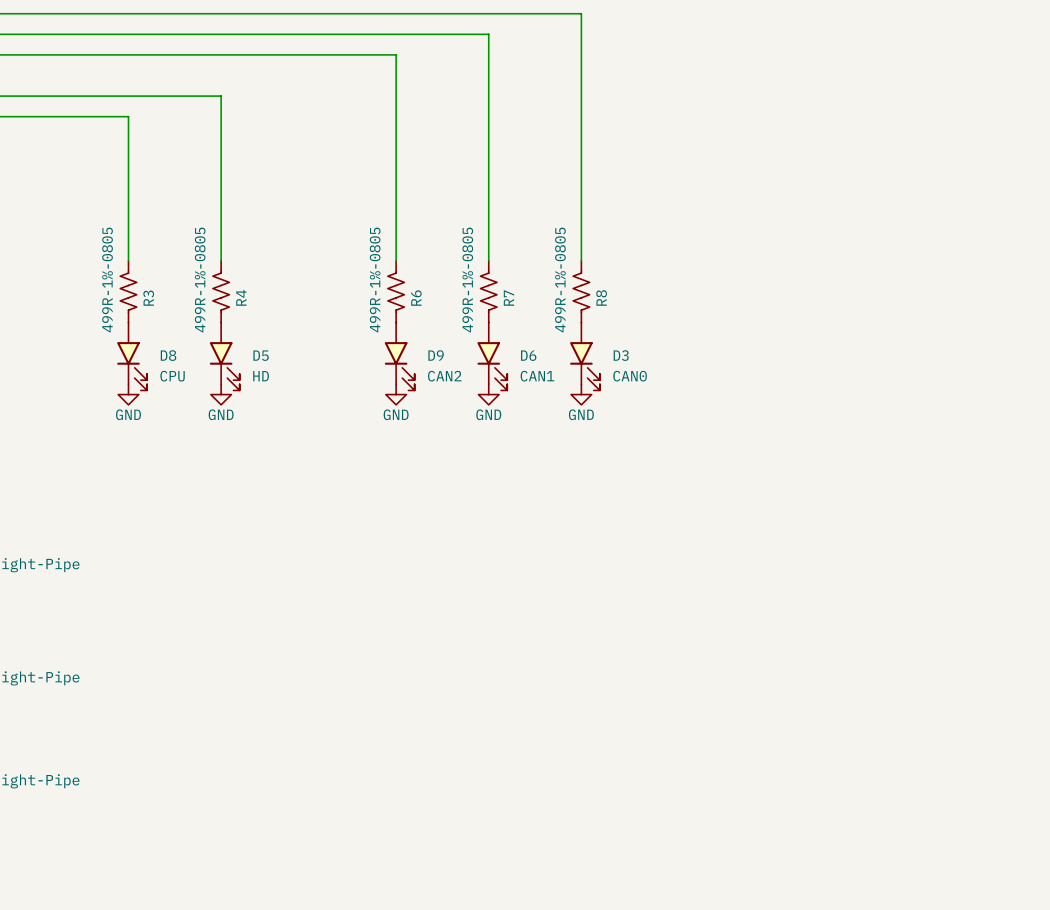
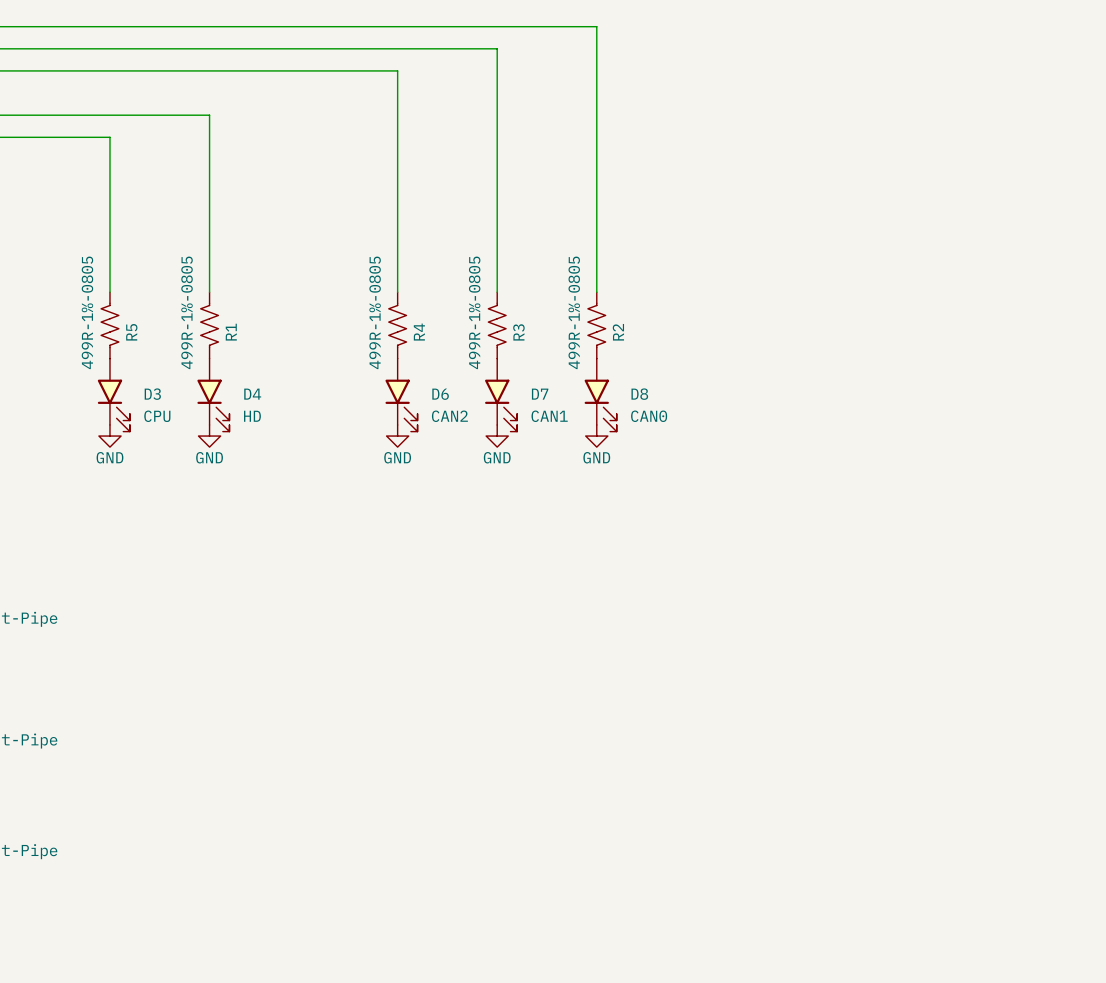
R4 name: R4 (241, 297) -> R1 (231, 332)
R8 name: R8 (601, 297) -> R2 (618, 332)
R3 name: R3 (148, 298) -> R5 (131, 332)
R6 name: R6 (416, 298) -> R4 (419, 332)
R7 name: R7 (508, 298) -> R3 (518, 332)
D8 name: D8 (168, 355) -> D3 (152, 394)
D5 name: D5 (261, 355) -> D4 (252, 394)
D9 name: D9 (436, 355) -> D6 (440, 394)
D6 name: D6 (528, 355) -> D7 (540, 394)
D3 name: D3 (621, 355) -> D8 (639, 394)

